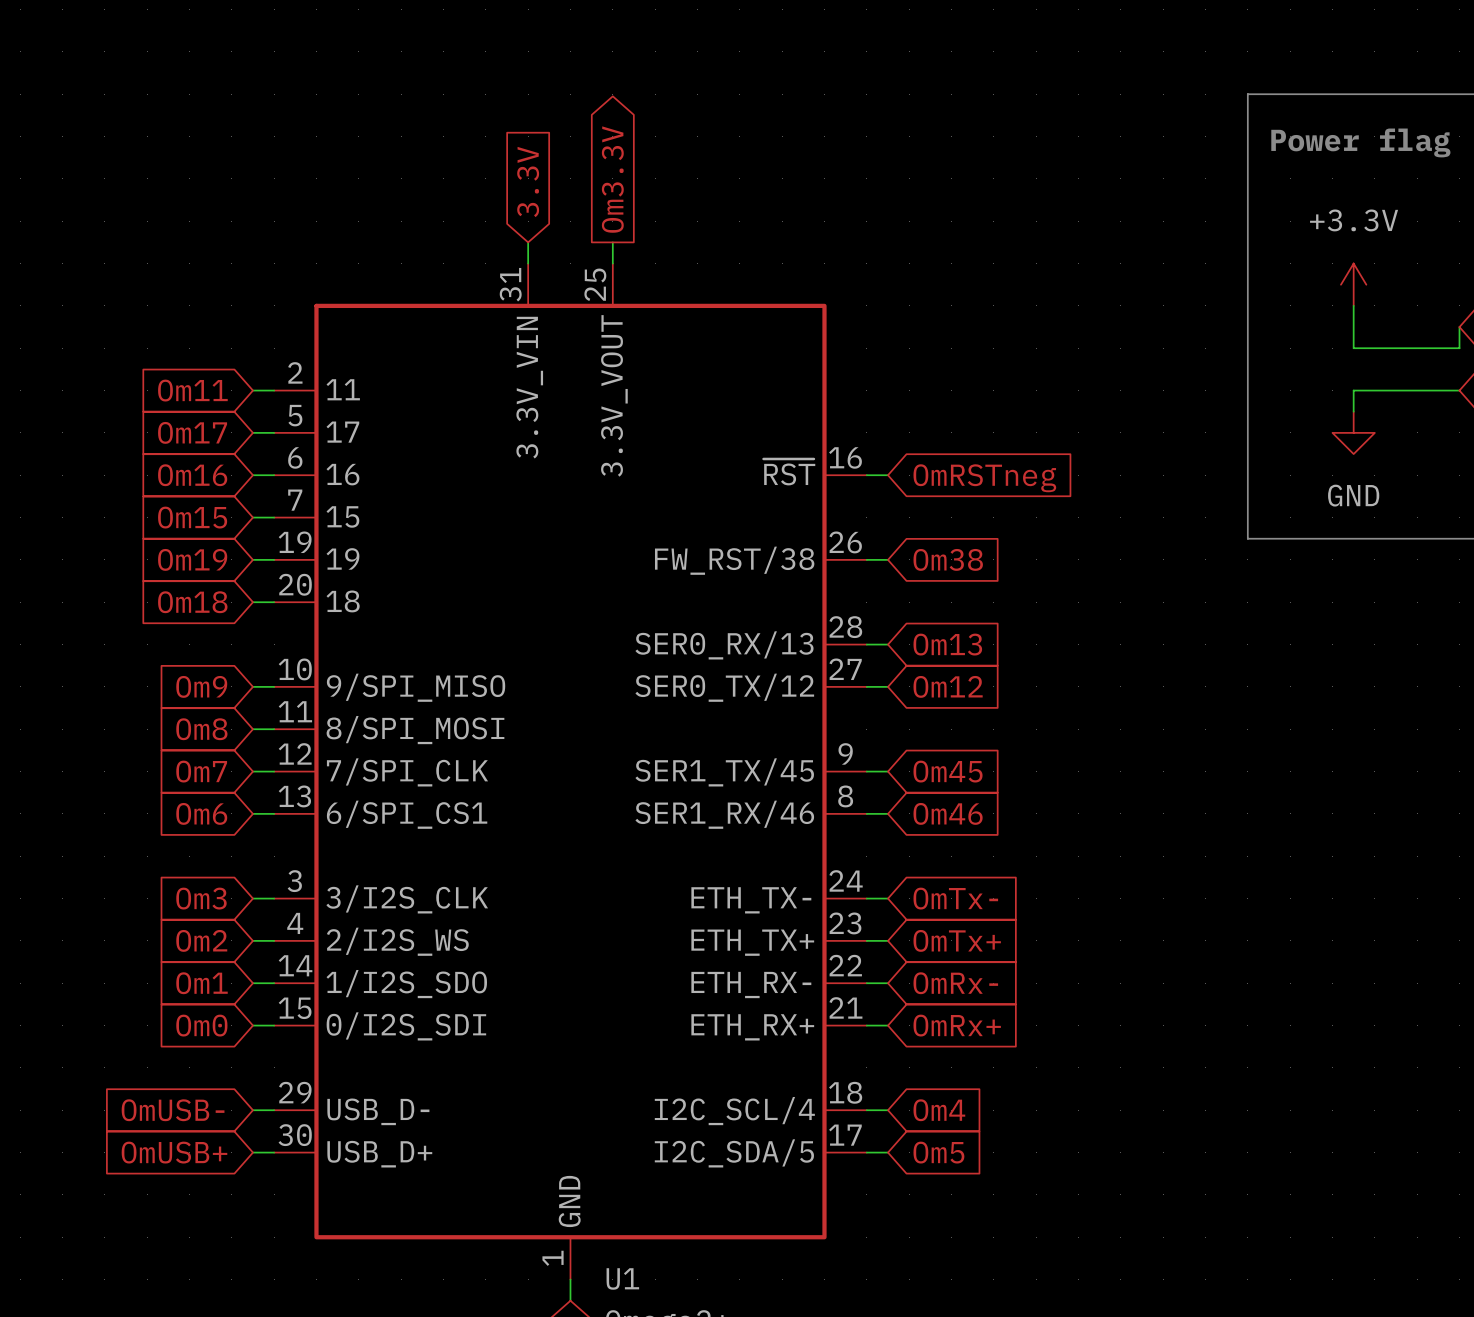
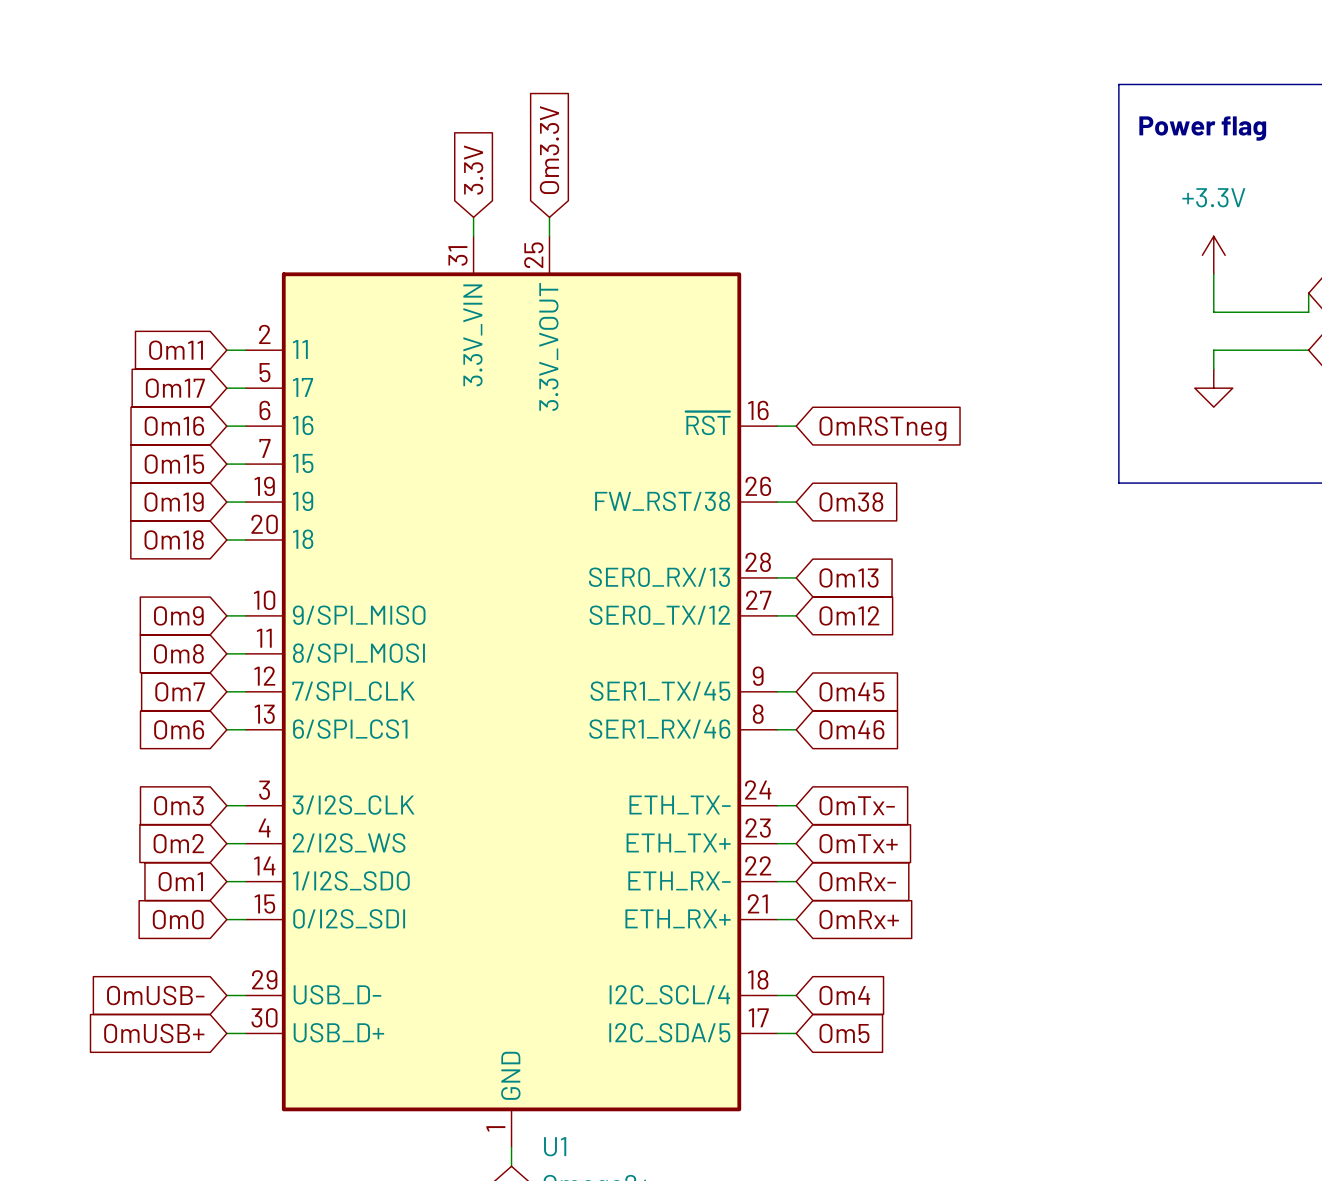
global label shape: output (612, 179) -> input (549, 150)
power symbol text: GND (1353, 495) -> none

